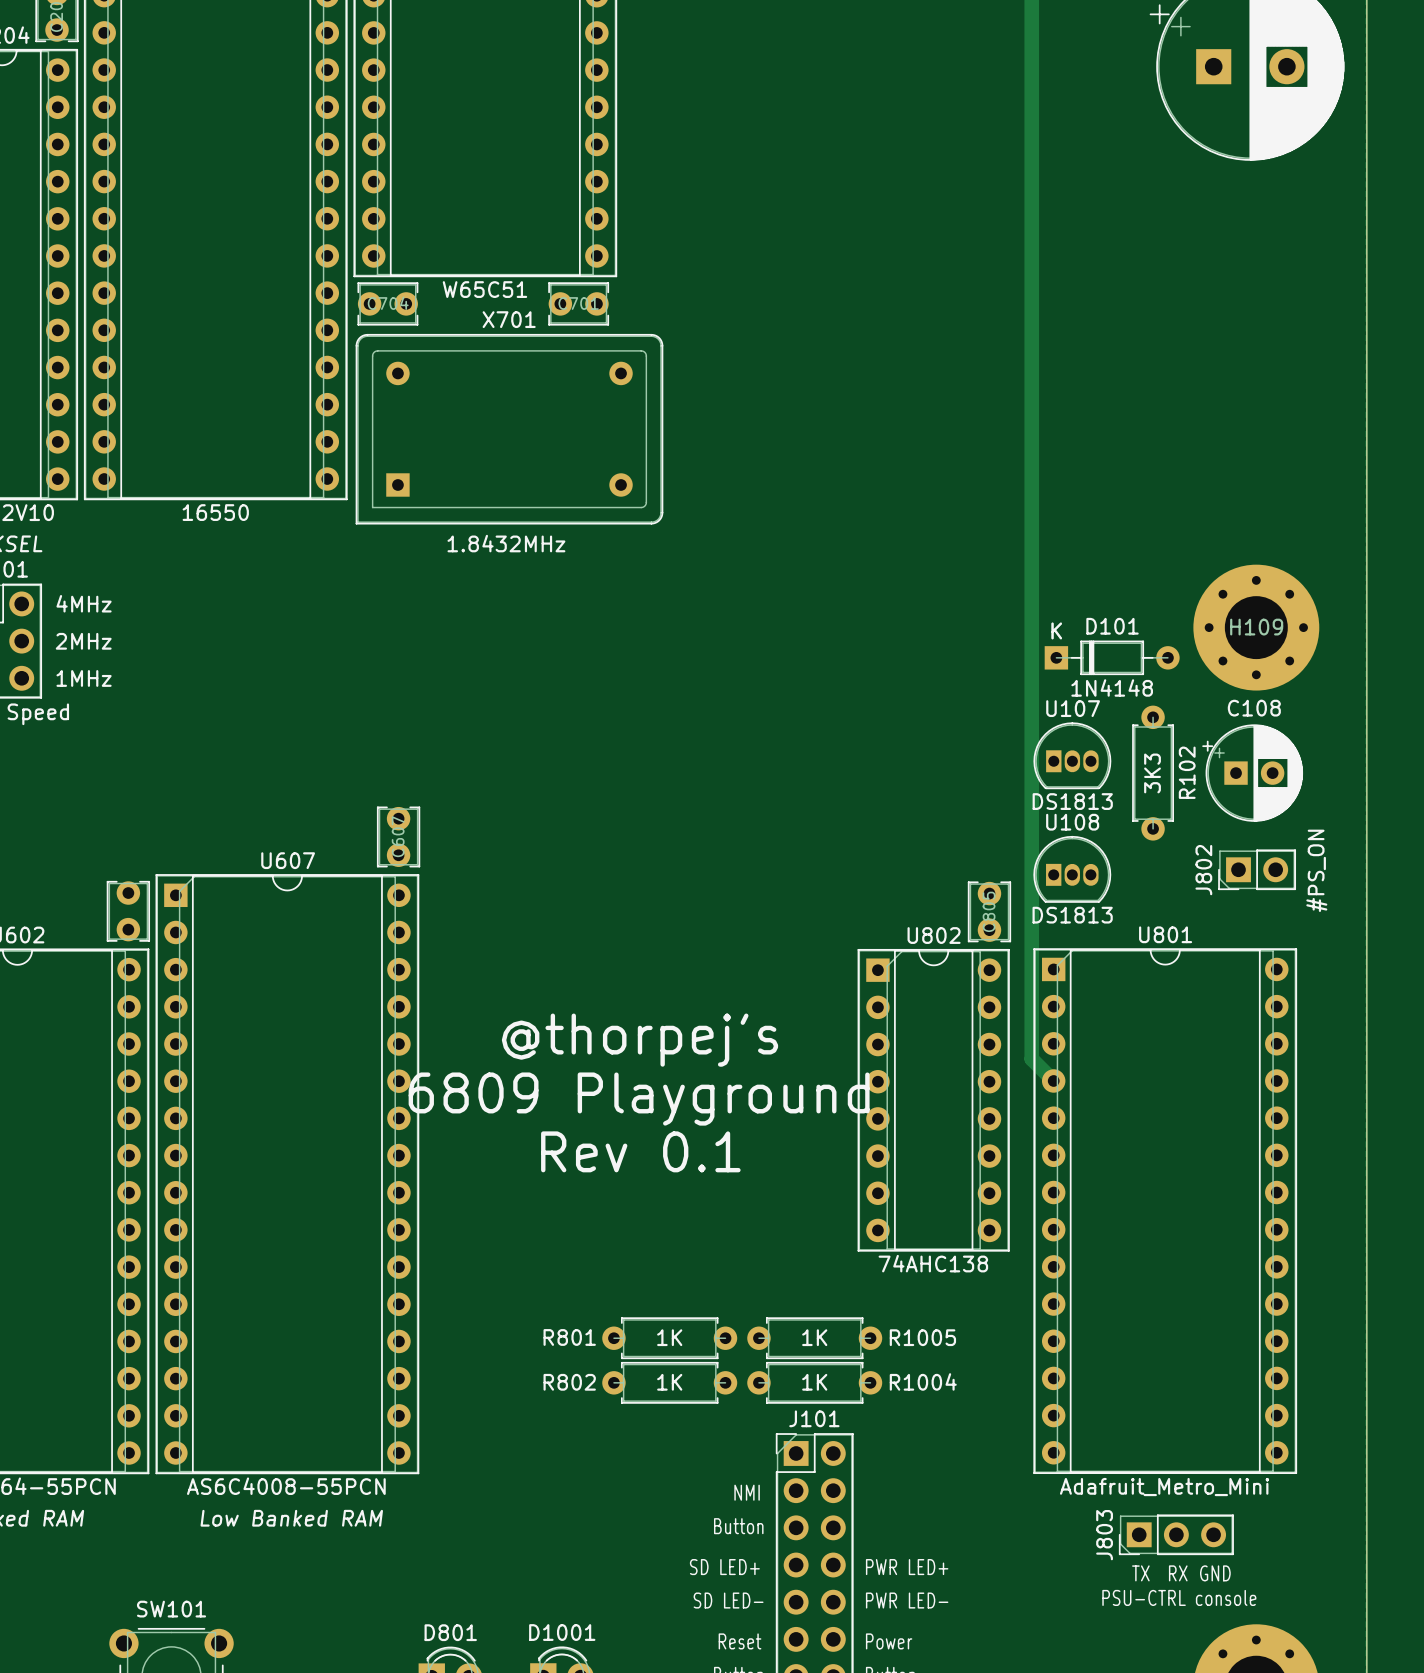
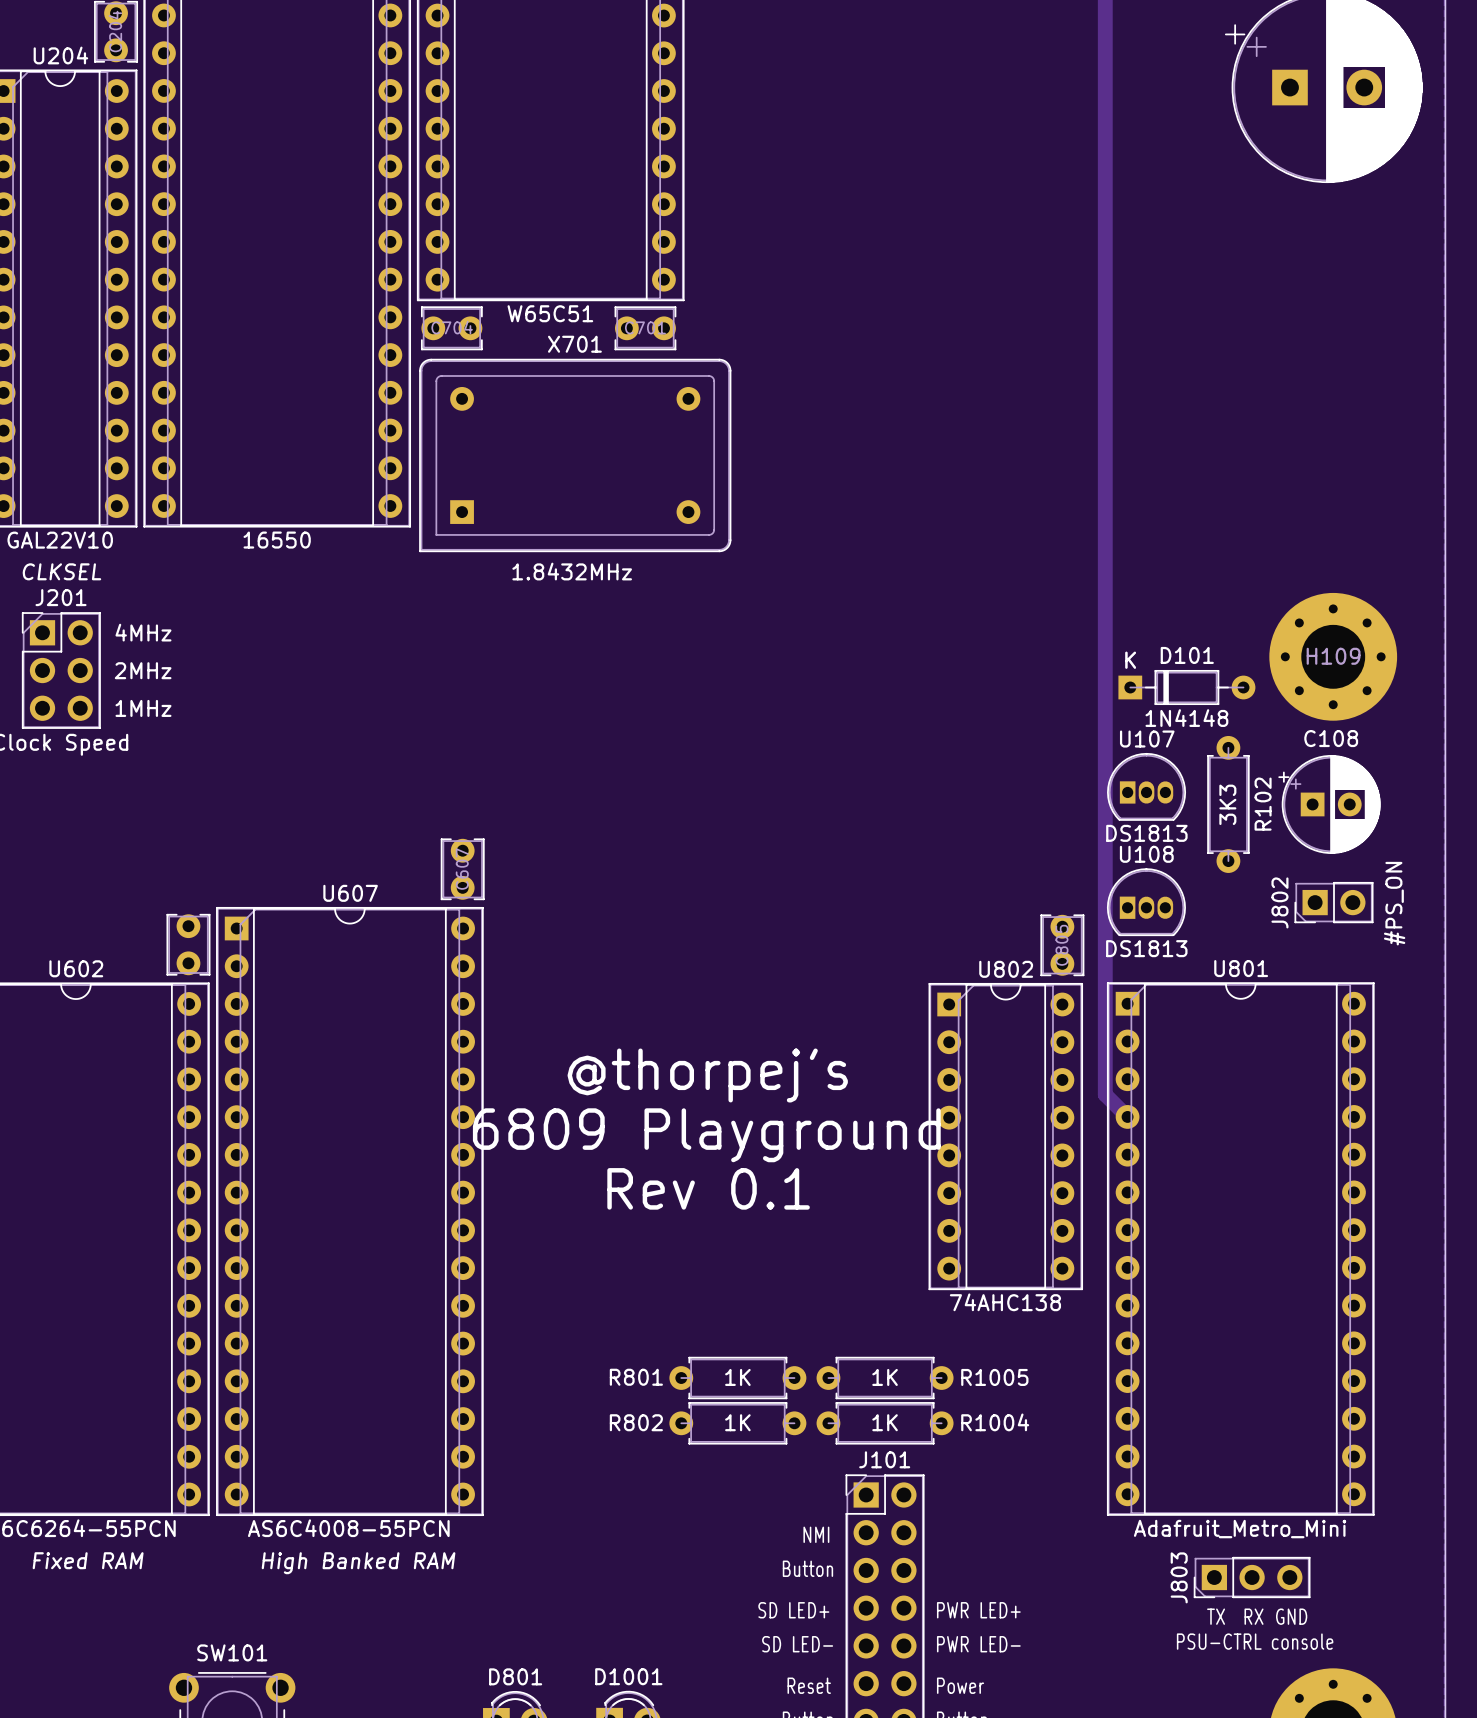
text: Low Banked RAM (291, 1518) -> High Banked RAM (358, 1563)

